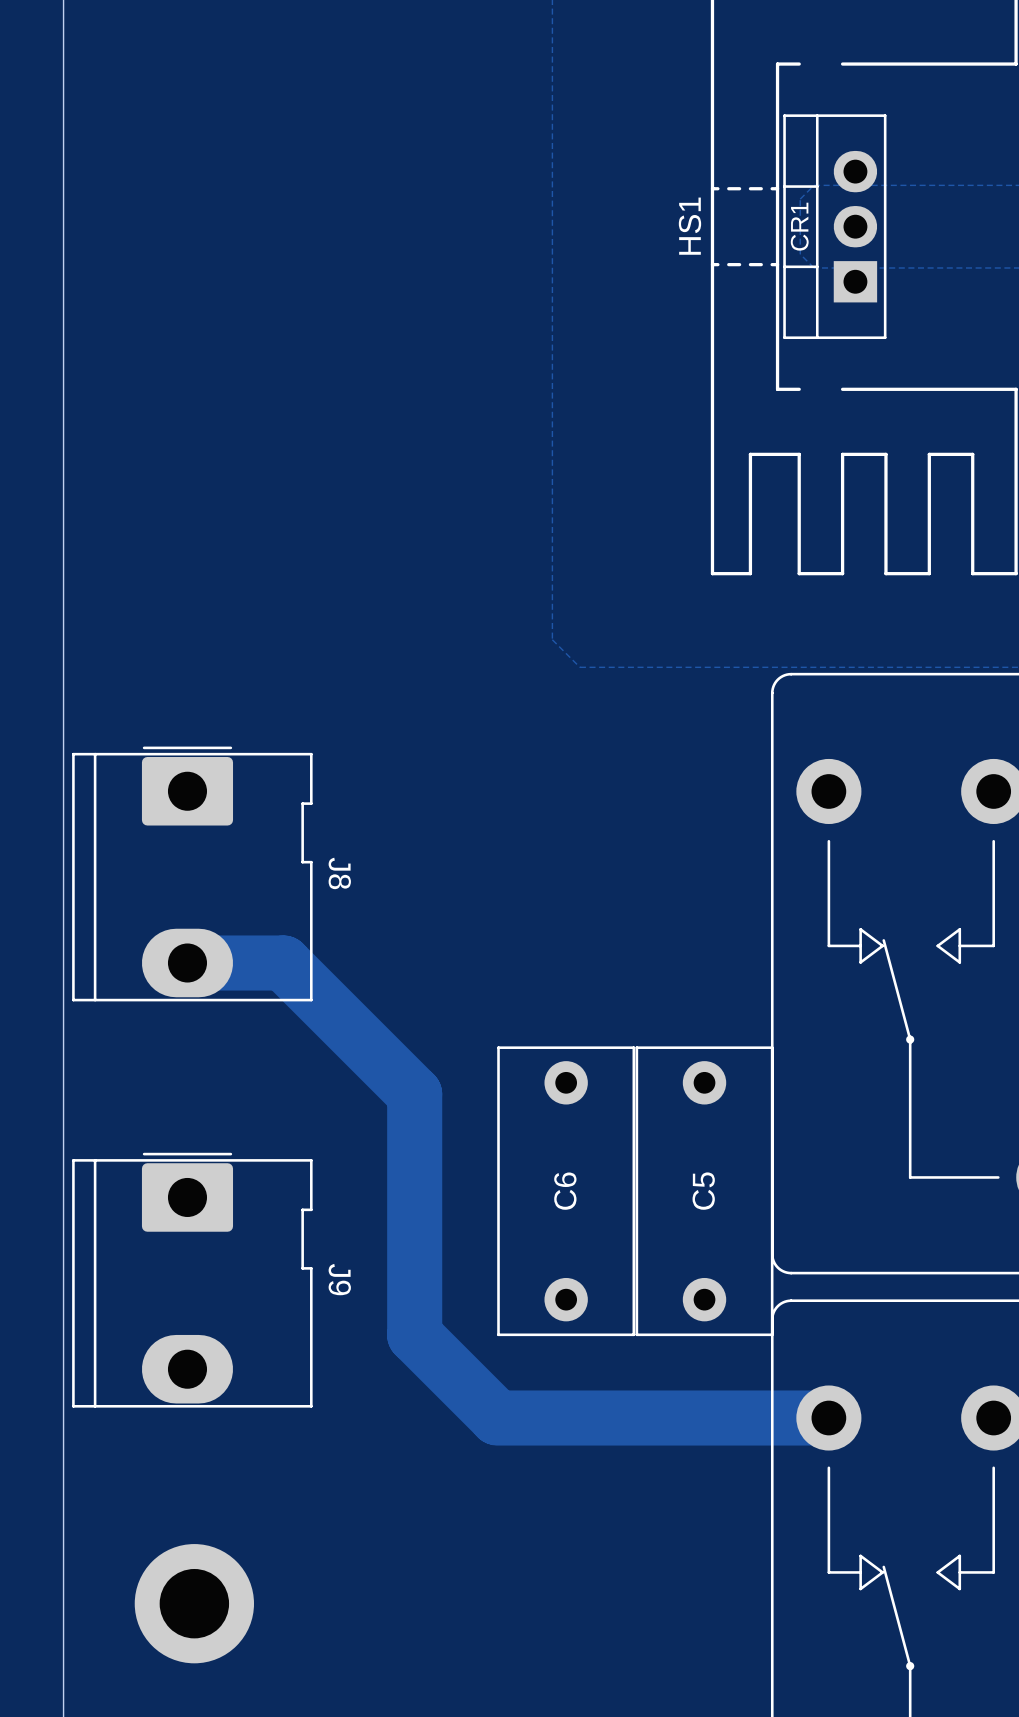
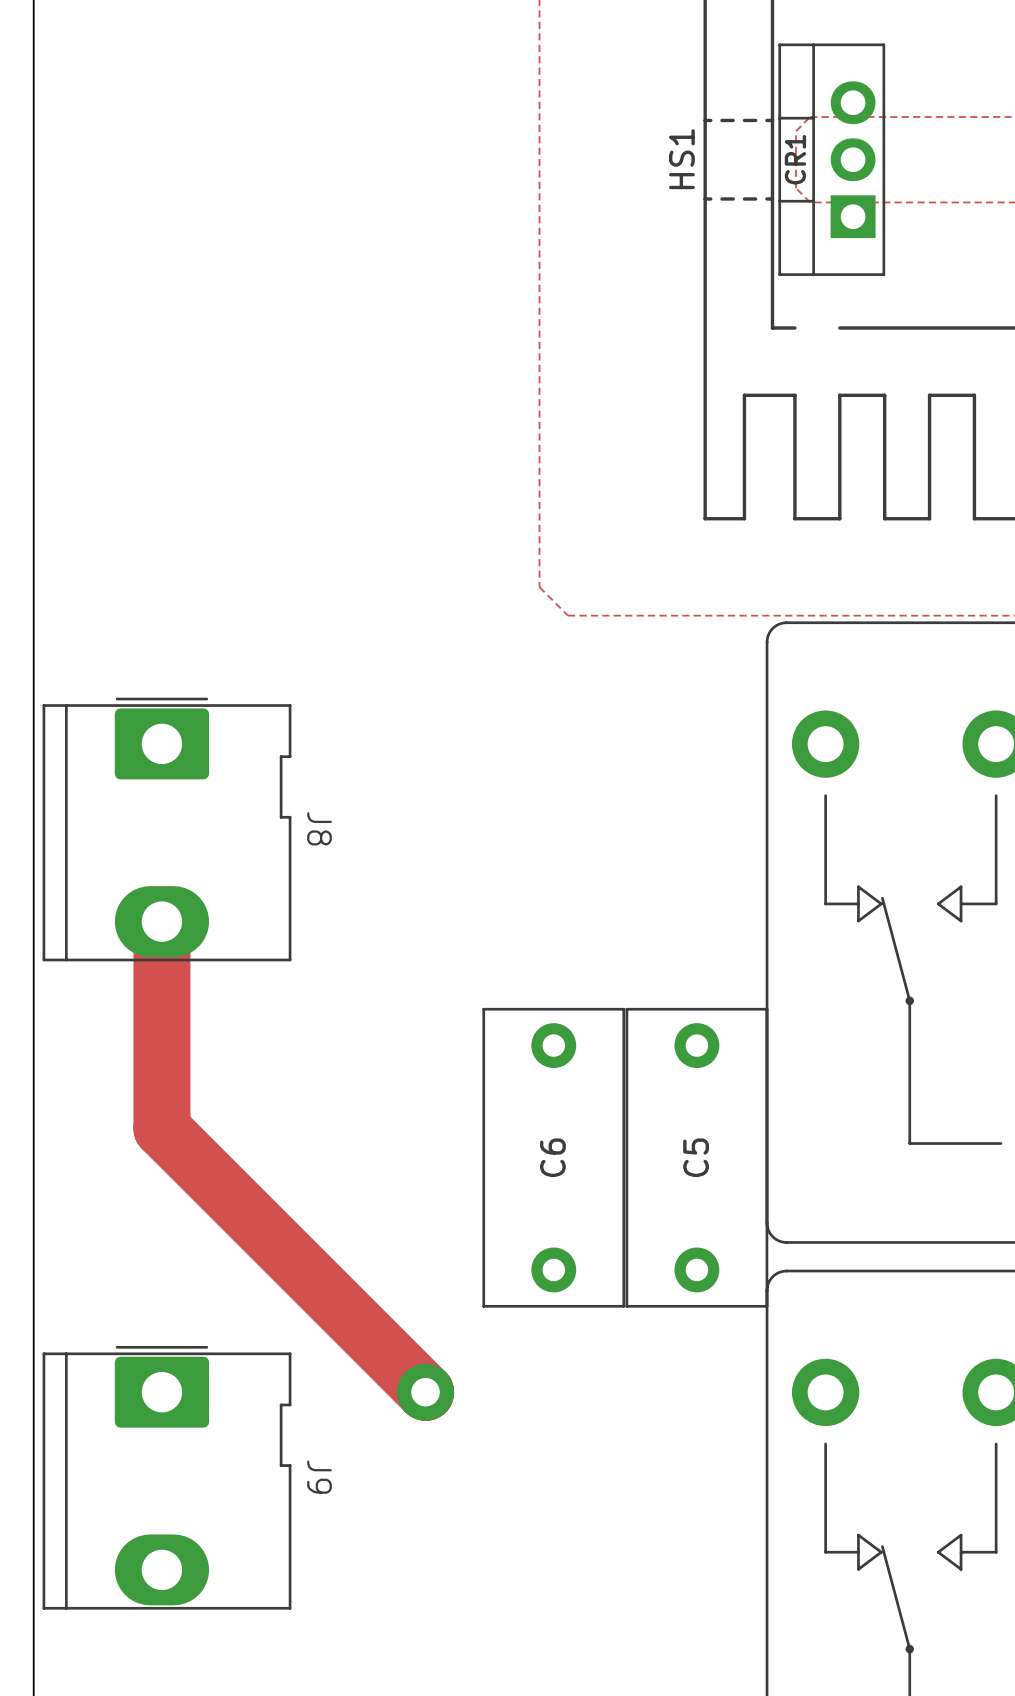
track: (187, 963) (283, 963) (414, 1094) (414, 1335) (497, 1417) -> (161, 921) (161, 1128) (425, 1392)
J9 position: (192, 1280) -> (166, 1477)
via: none -> (425, 1392)
track: (497, 1418) (828, 1418) -> none
part: (194, 1603) -> none

